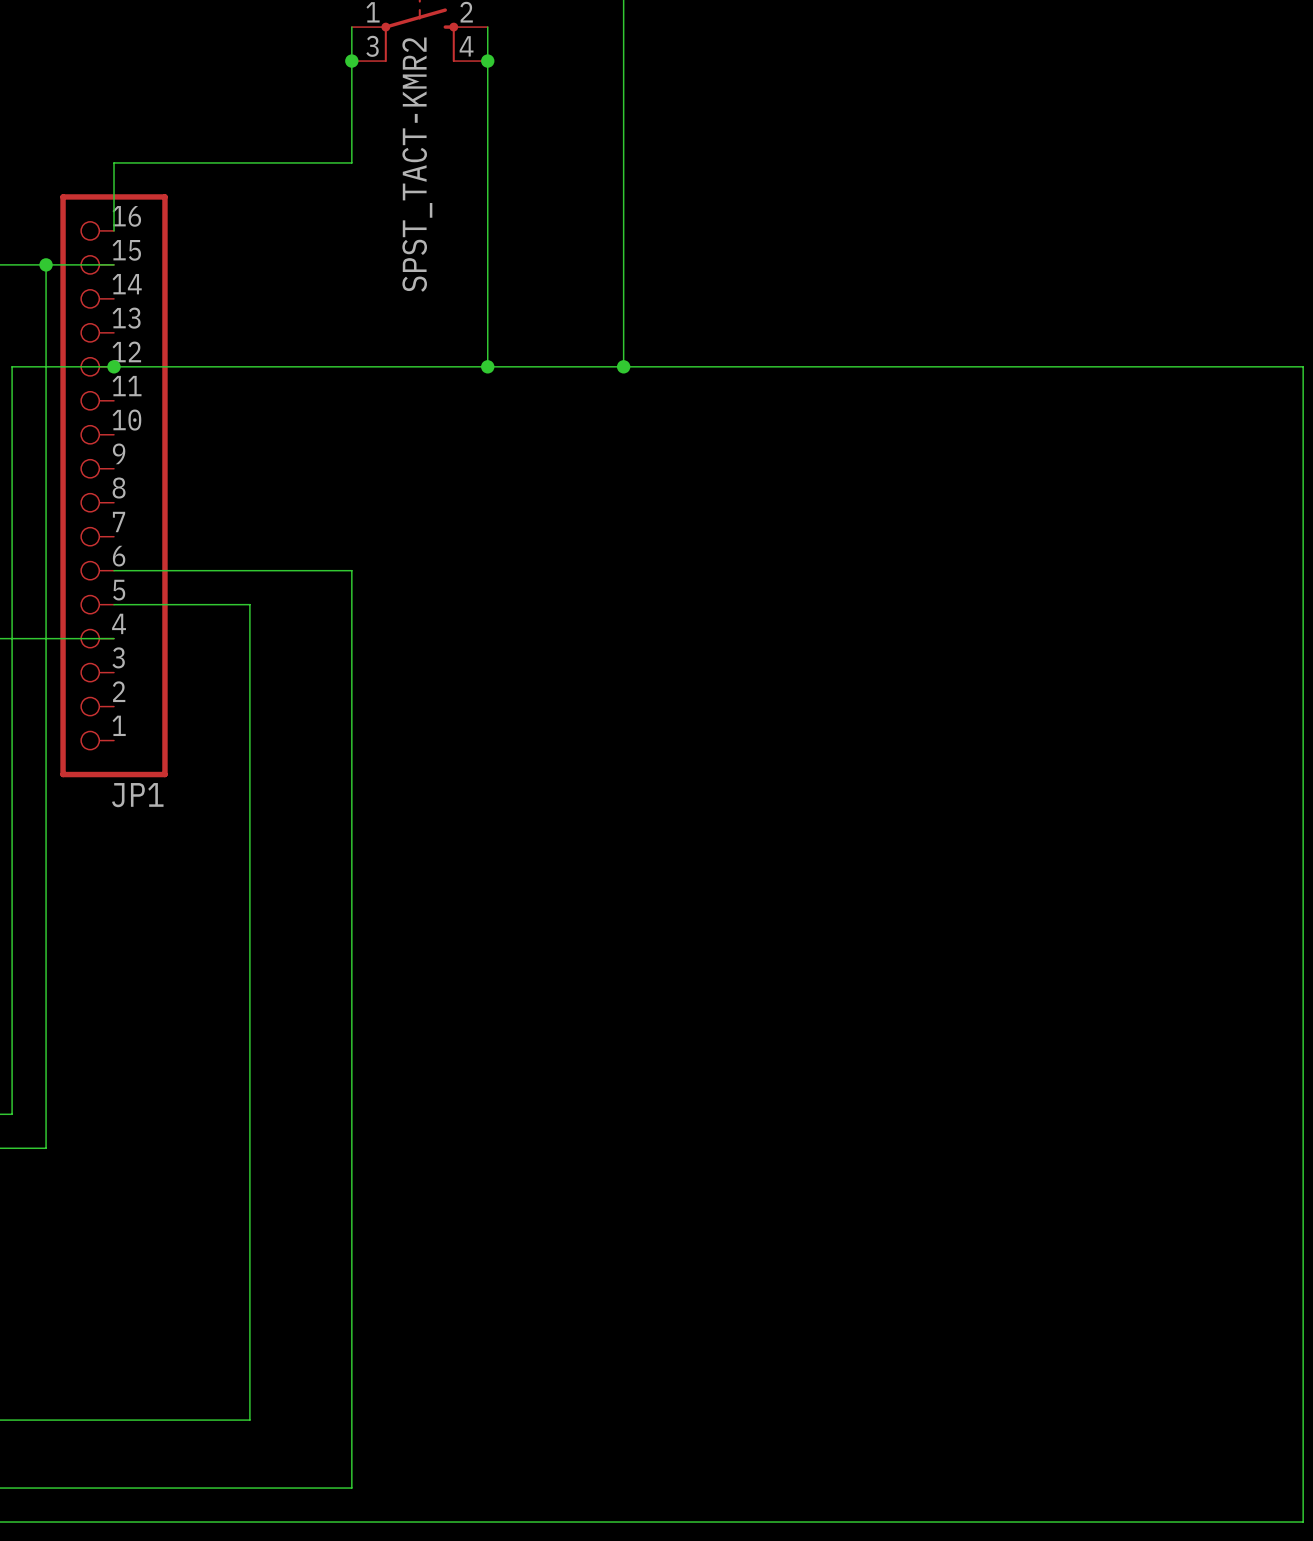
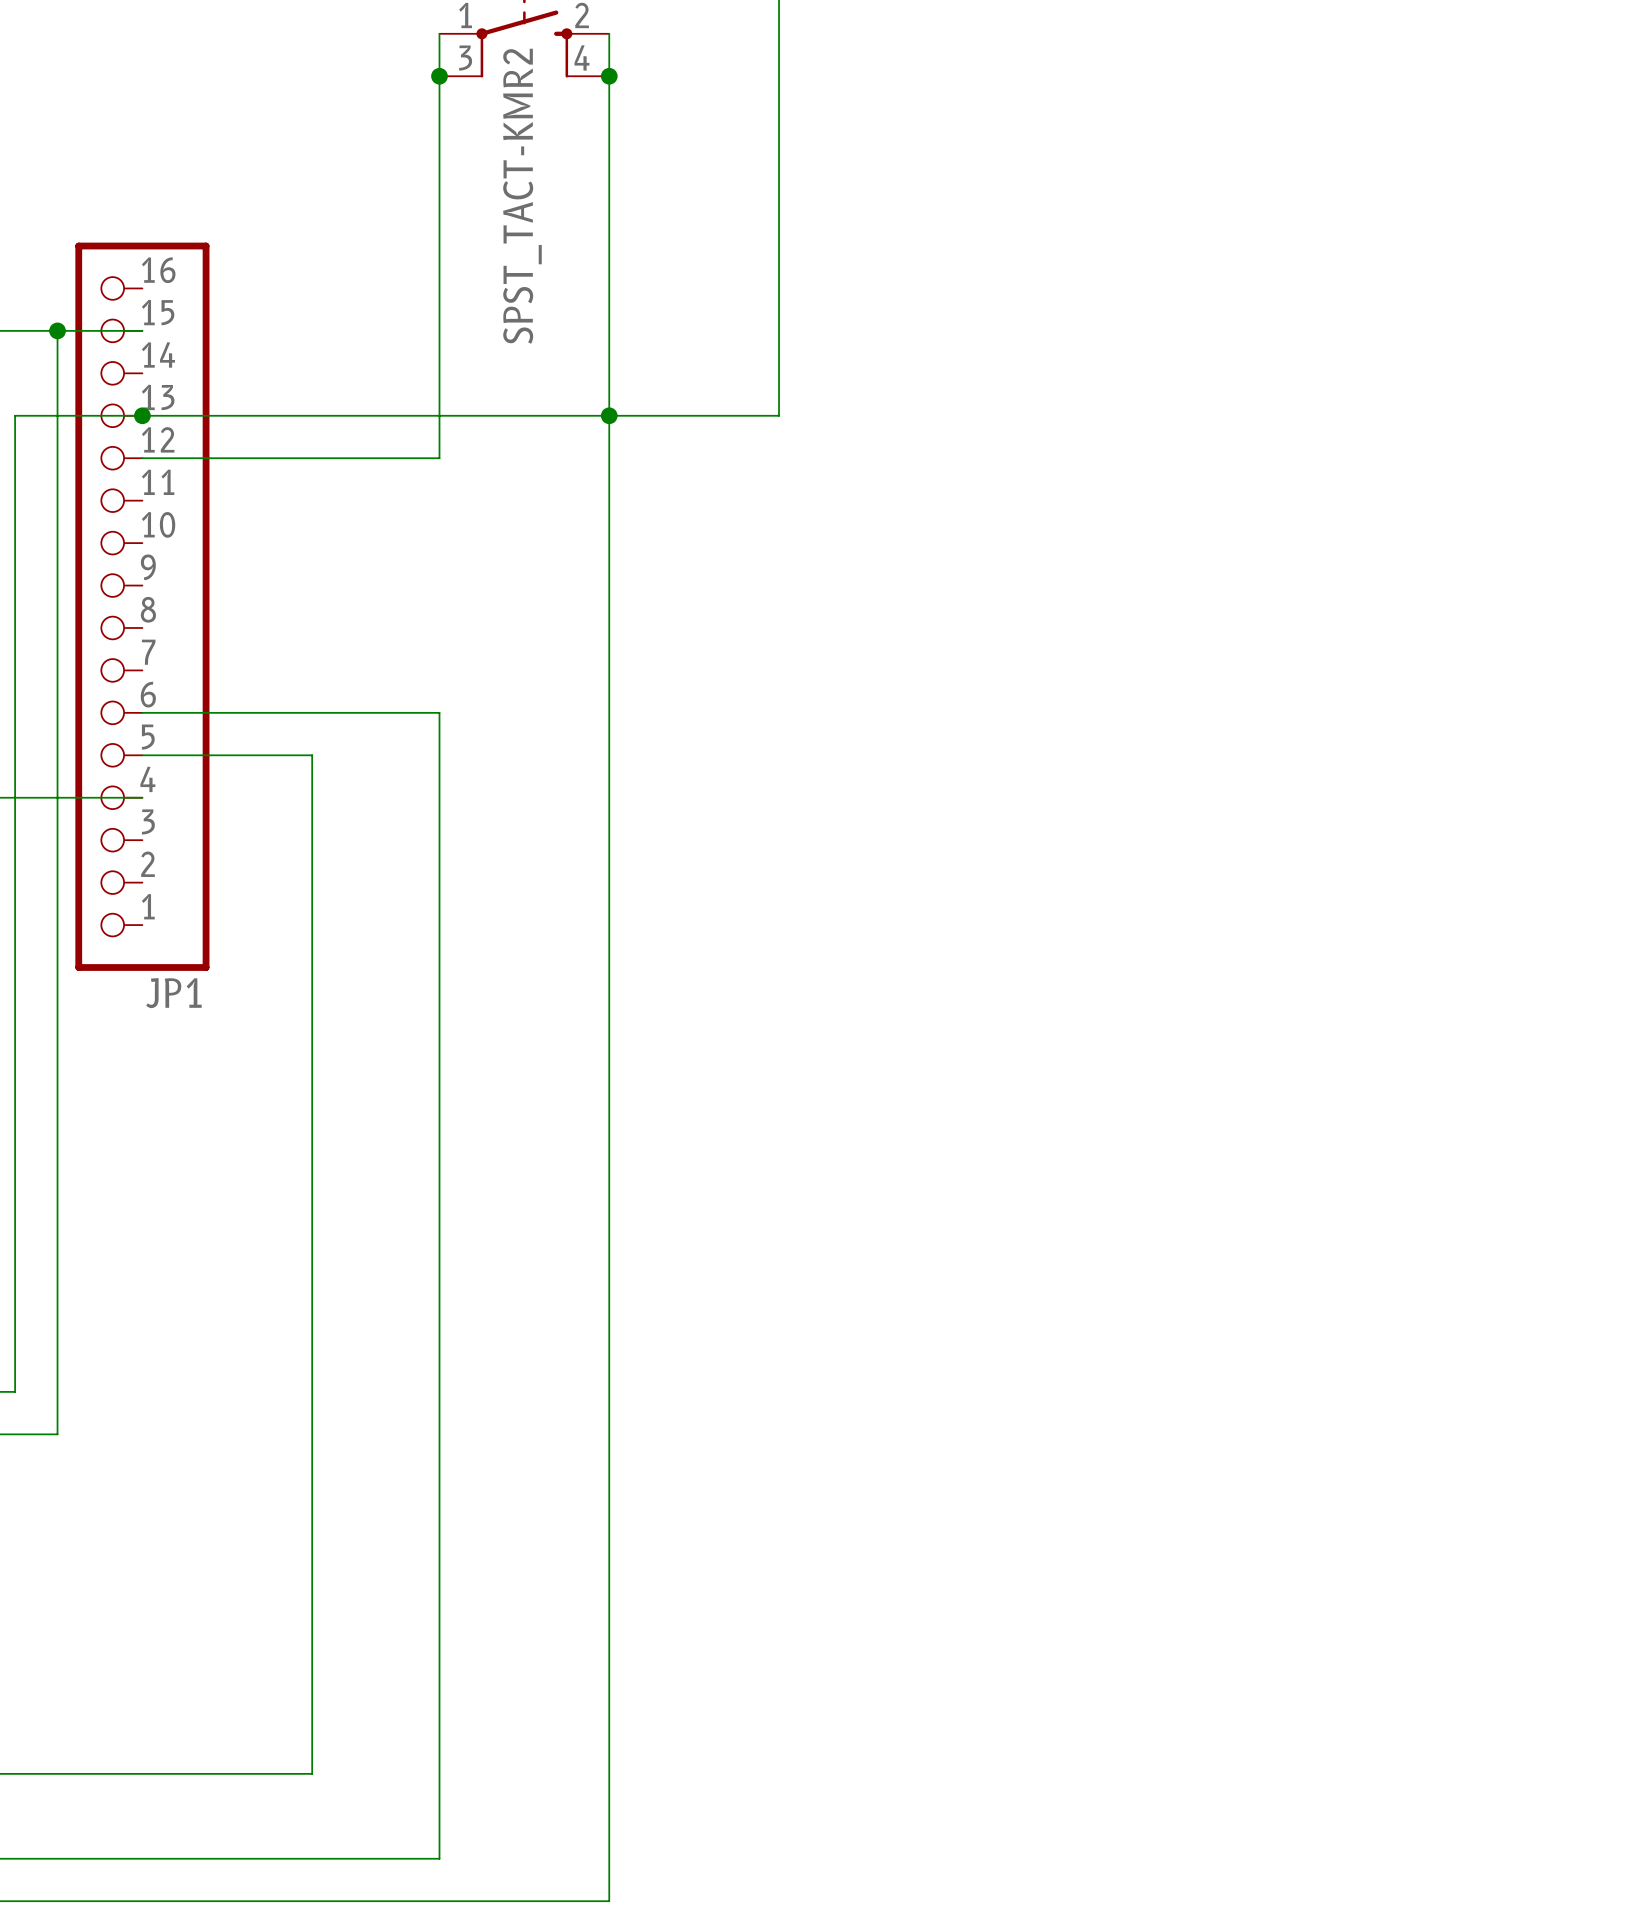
wire: (351, 162) (114, 162) (114, 230) -> (439, 203) (439, 458)
wire: (623, 332) (623, 366) -> none
wire: (12, 366) (114, 366) -> (15, 458) (15, 415) (779, 415)
junction position: (114, 366) -> (142, 415)
wire: (351, 366) (1303, 366) (1303, 1522) (487, 1522) -> (609, 458) (609, 1901)
junction position: (487, 366) -> (609, 415)
junction: (623, 366) -> none

